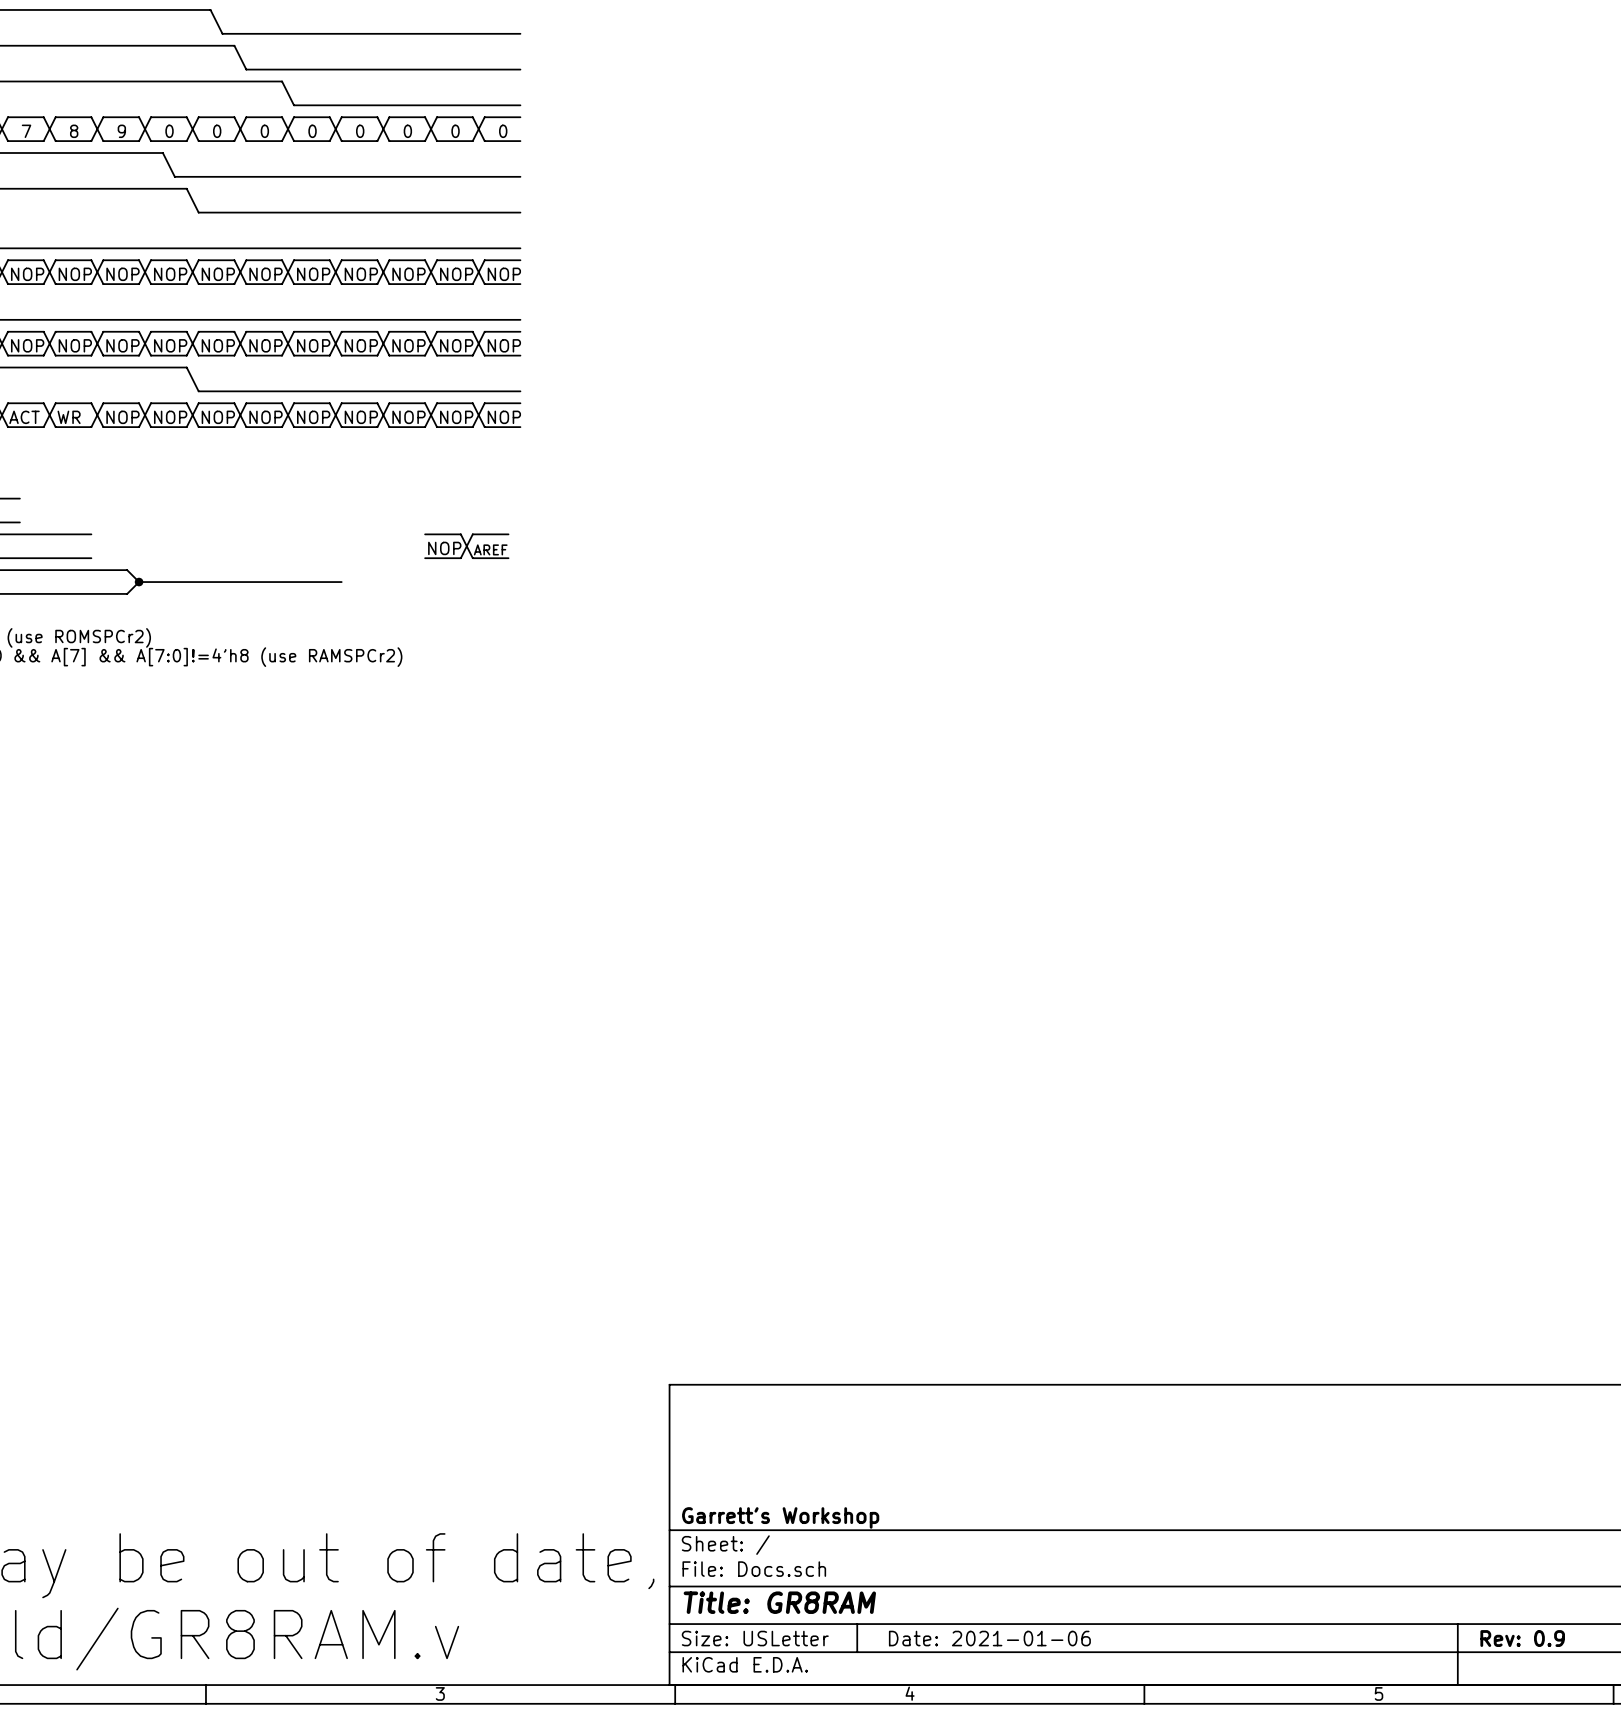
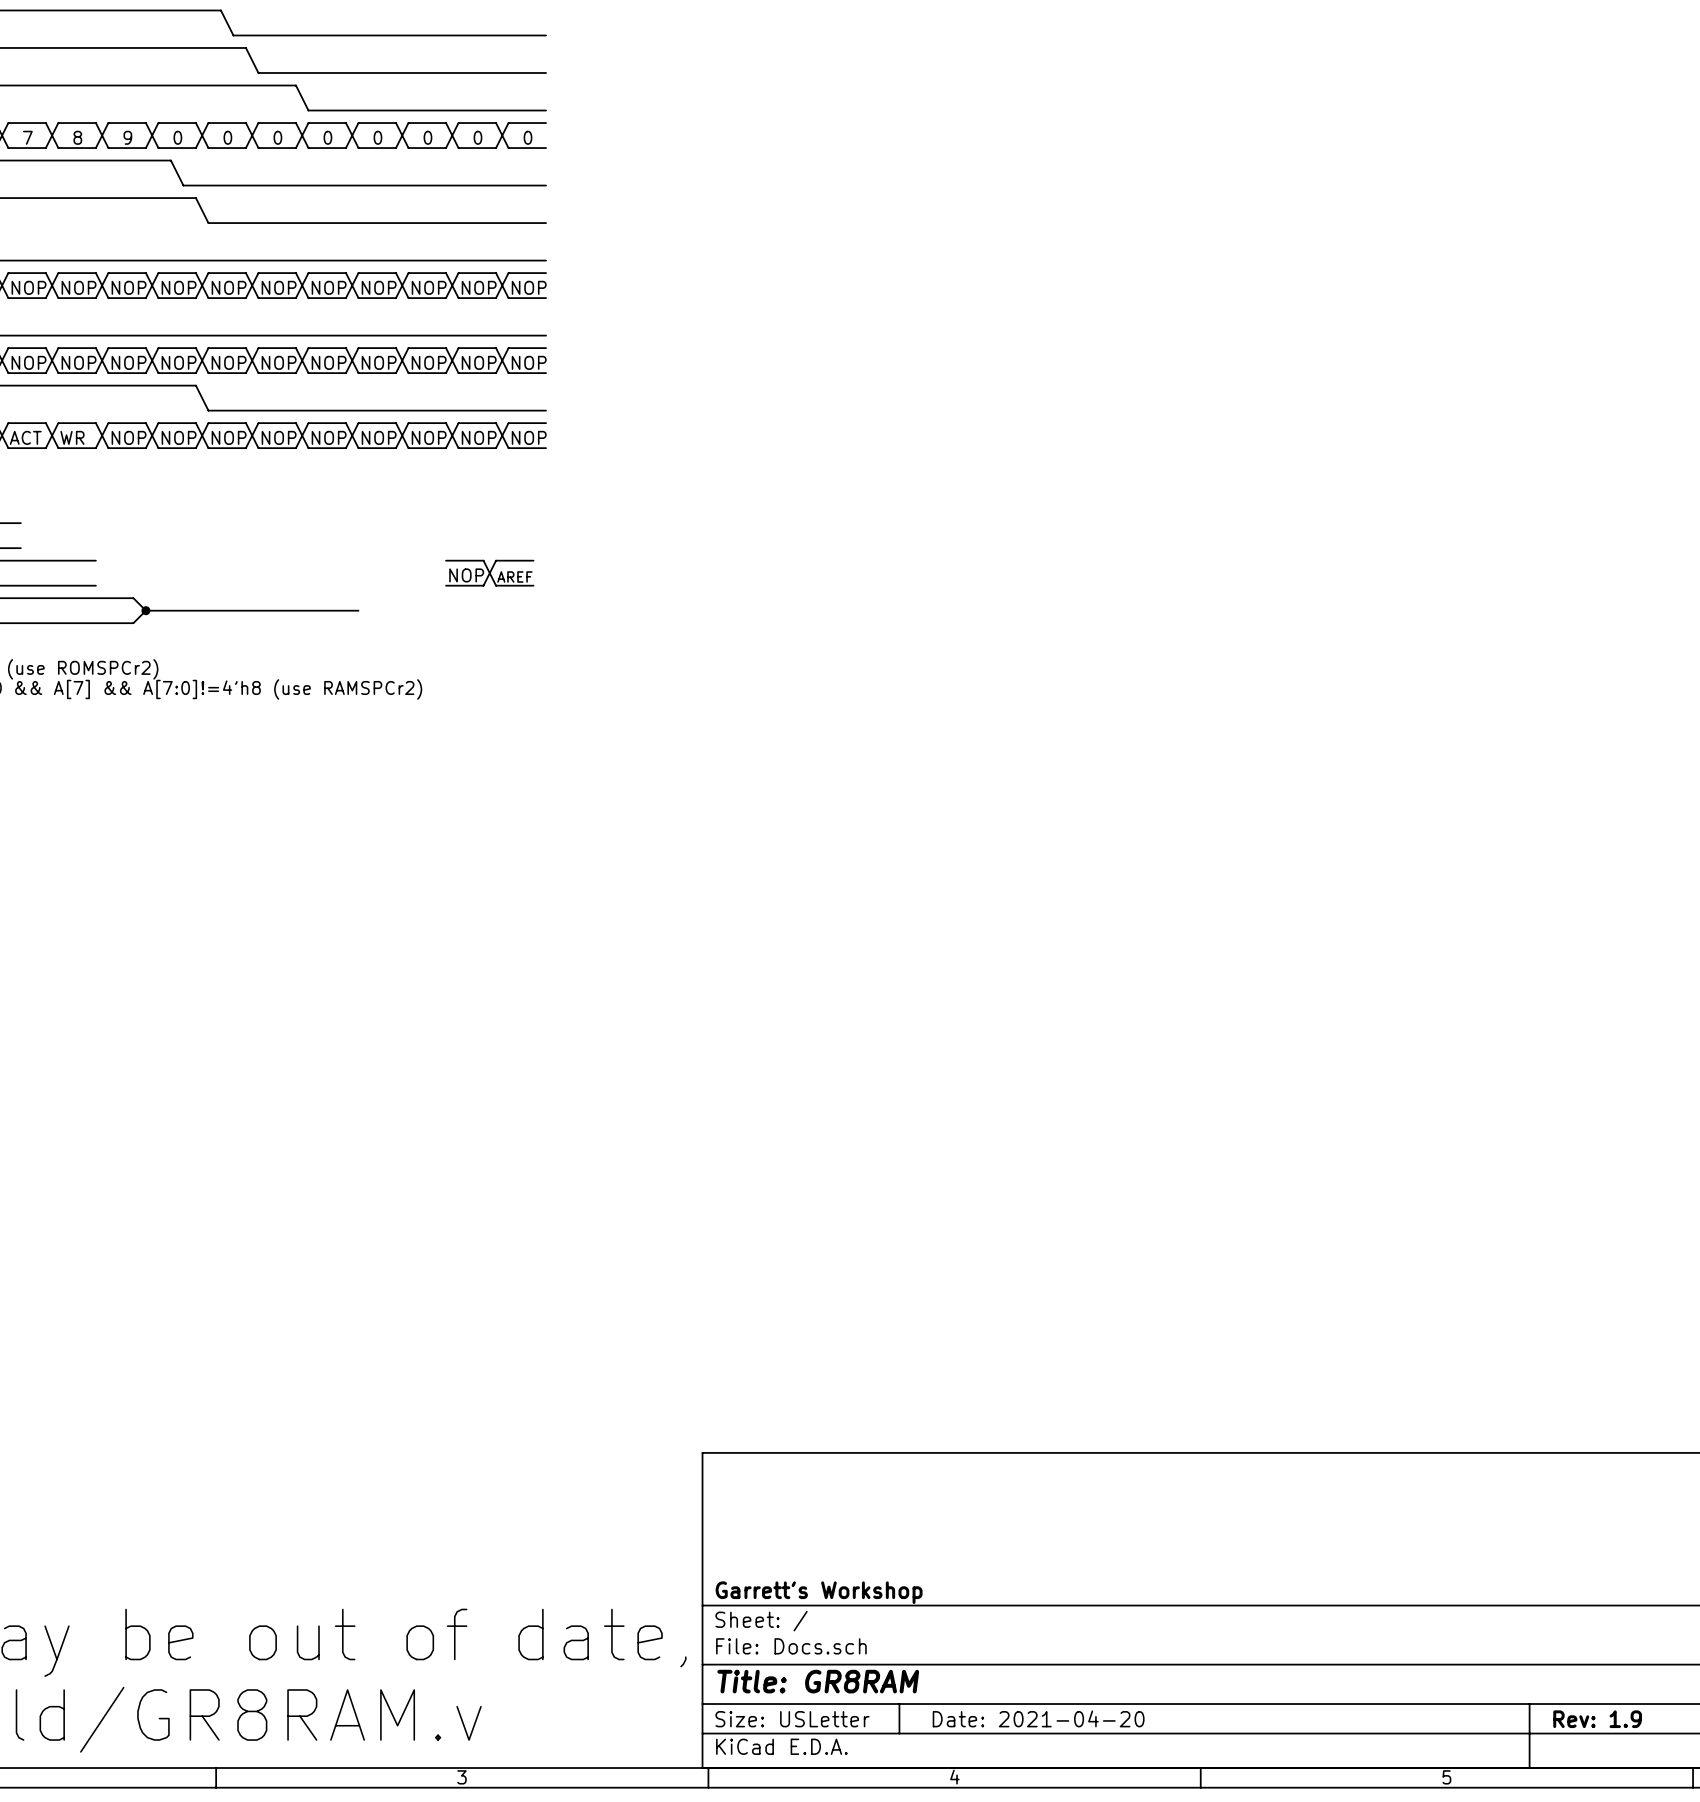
title block: Date: 2021-01-06 (989, 1638) -> Date: 2021-04-20 (1038, 1718)
title block: Rev: 0.9 (1522, 1638) -> Rev: 1.9 (1597, 1719)

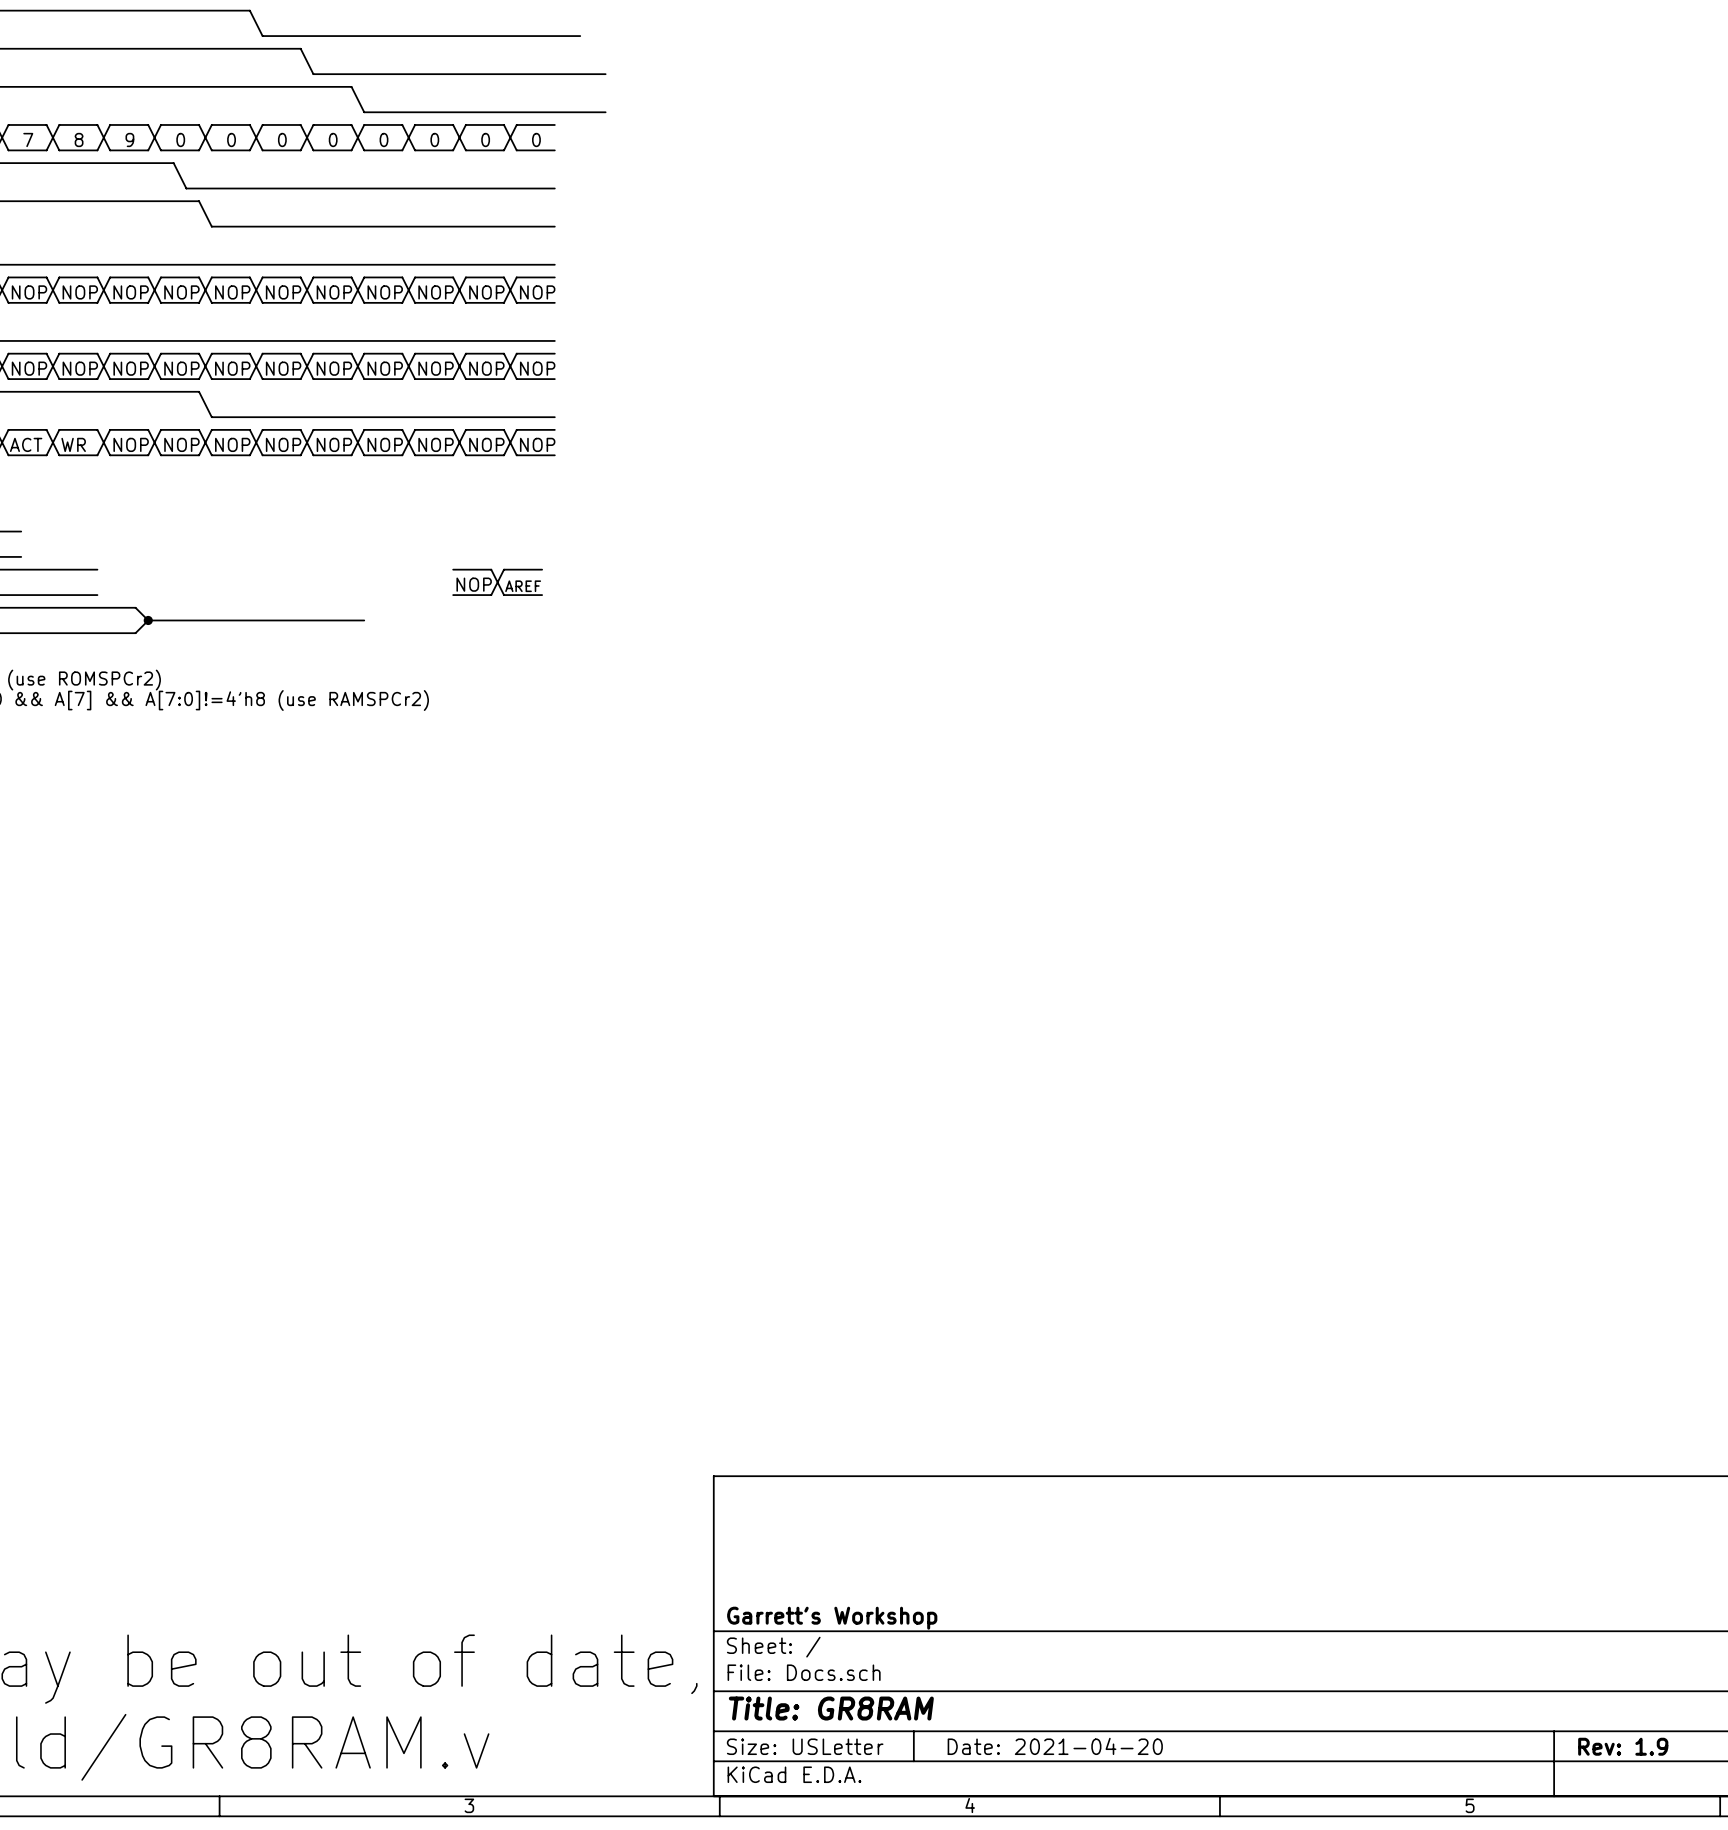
wire: (220, 10) (233, 35) (258, 35) -> (224, 10) (249, 10) (262, 36)
wire: none -> (554, 36) (580, 36)
wire: (245, 47) (258, 73) (308, 73) -> (249, 48) (300, 48) (313, 74)
wire: none -> (554, 74) (605, 74)
wire: (295, 85) (308, 110) (358, 110) -> (300, 86) (351, 86) (364, 112)
wire: none -> (554, 112) (605, 112)

